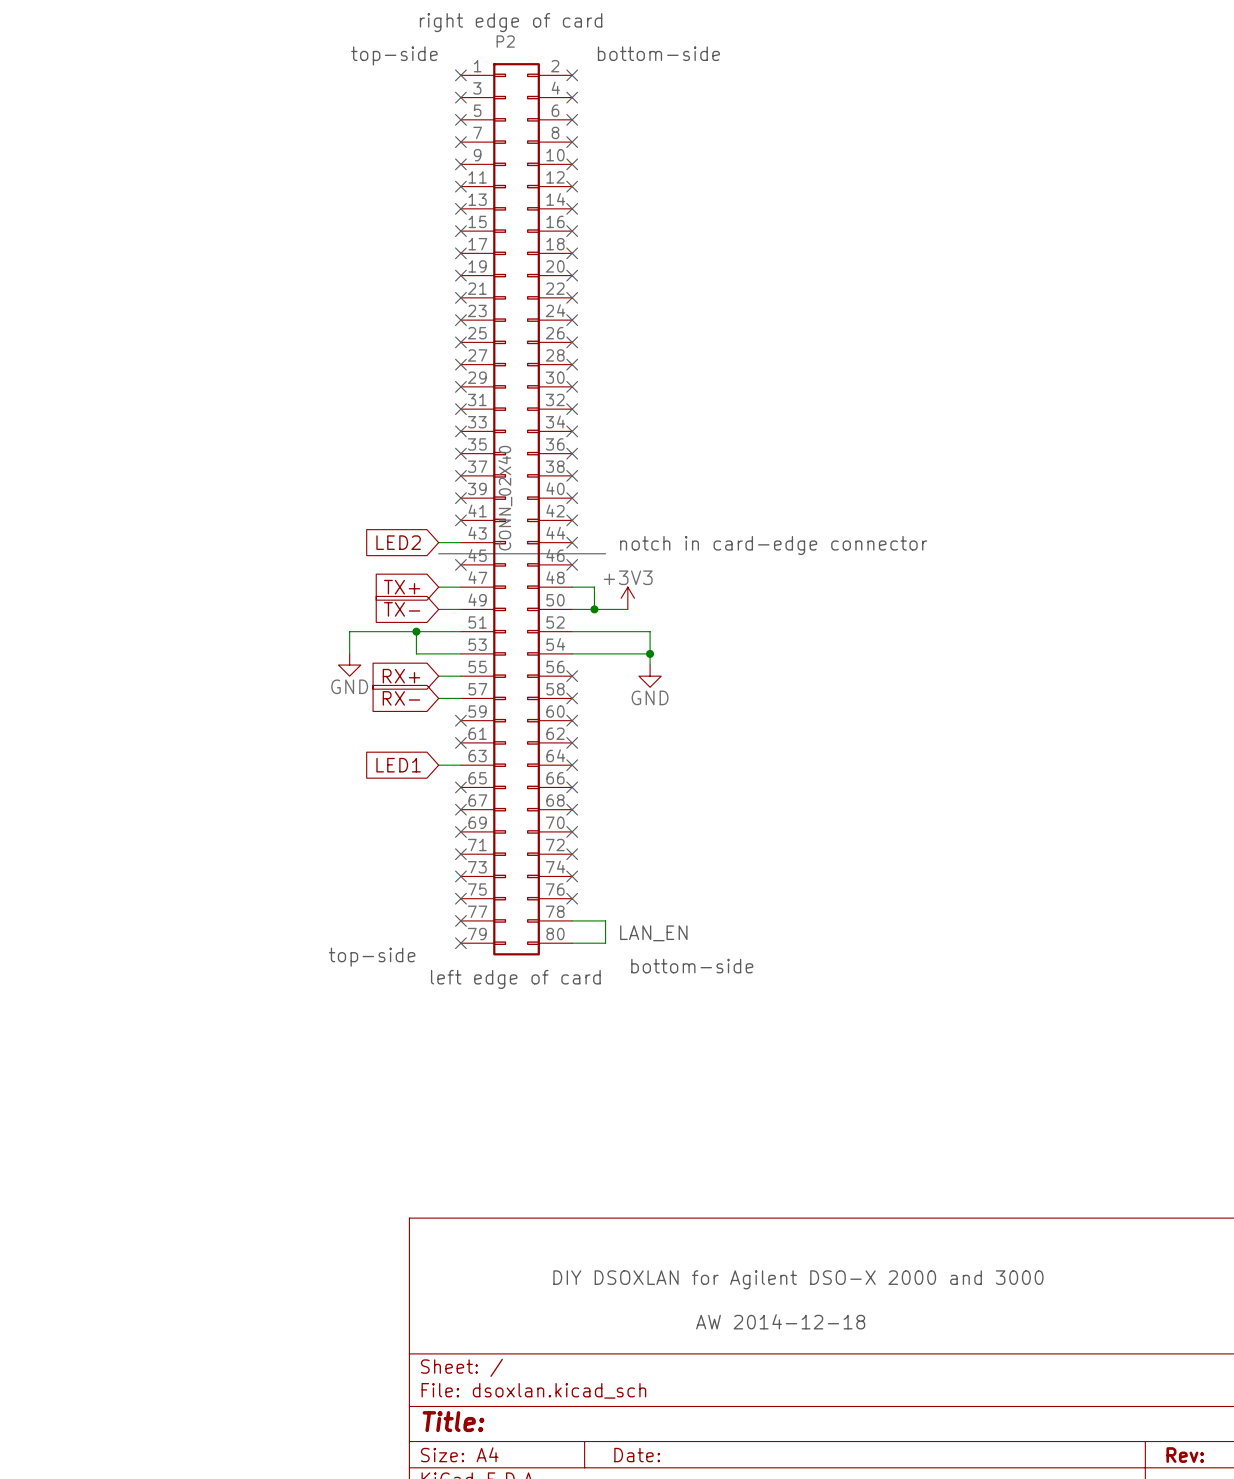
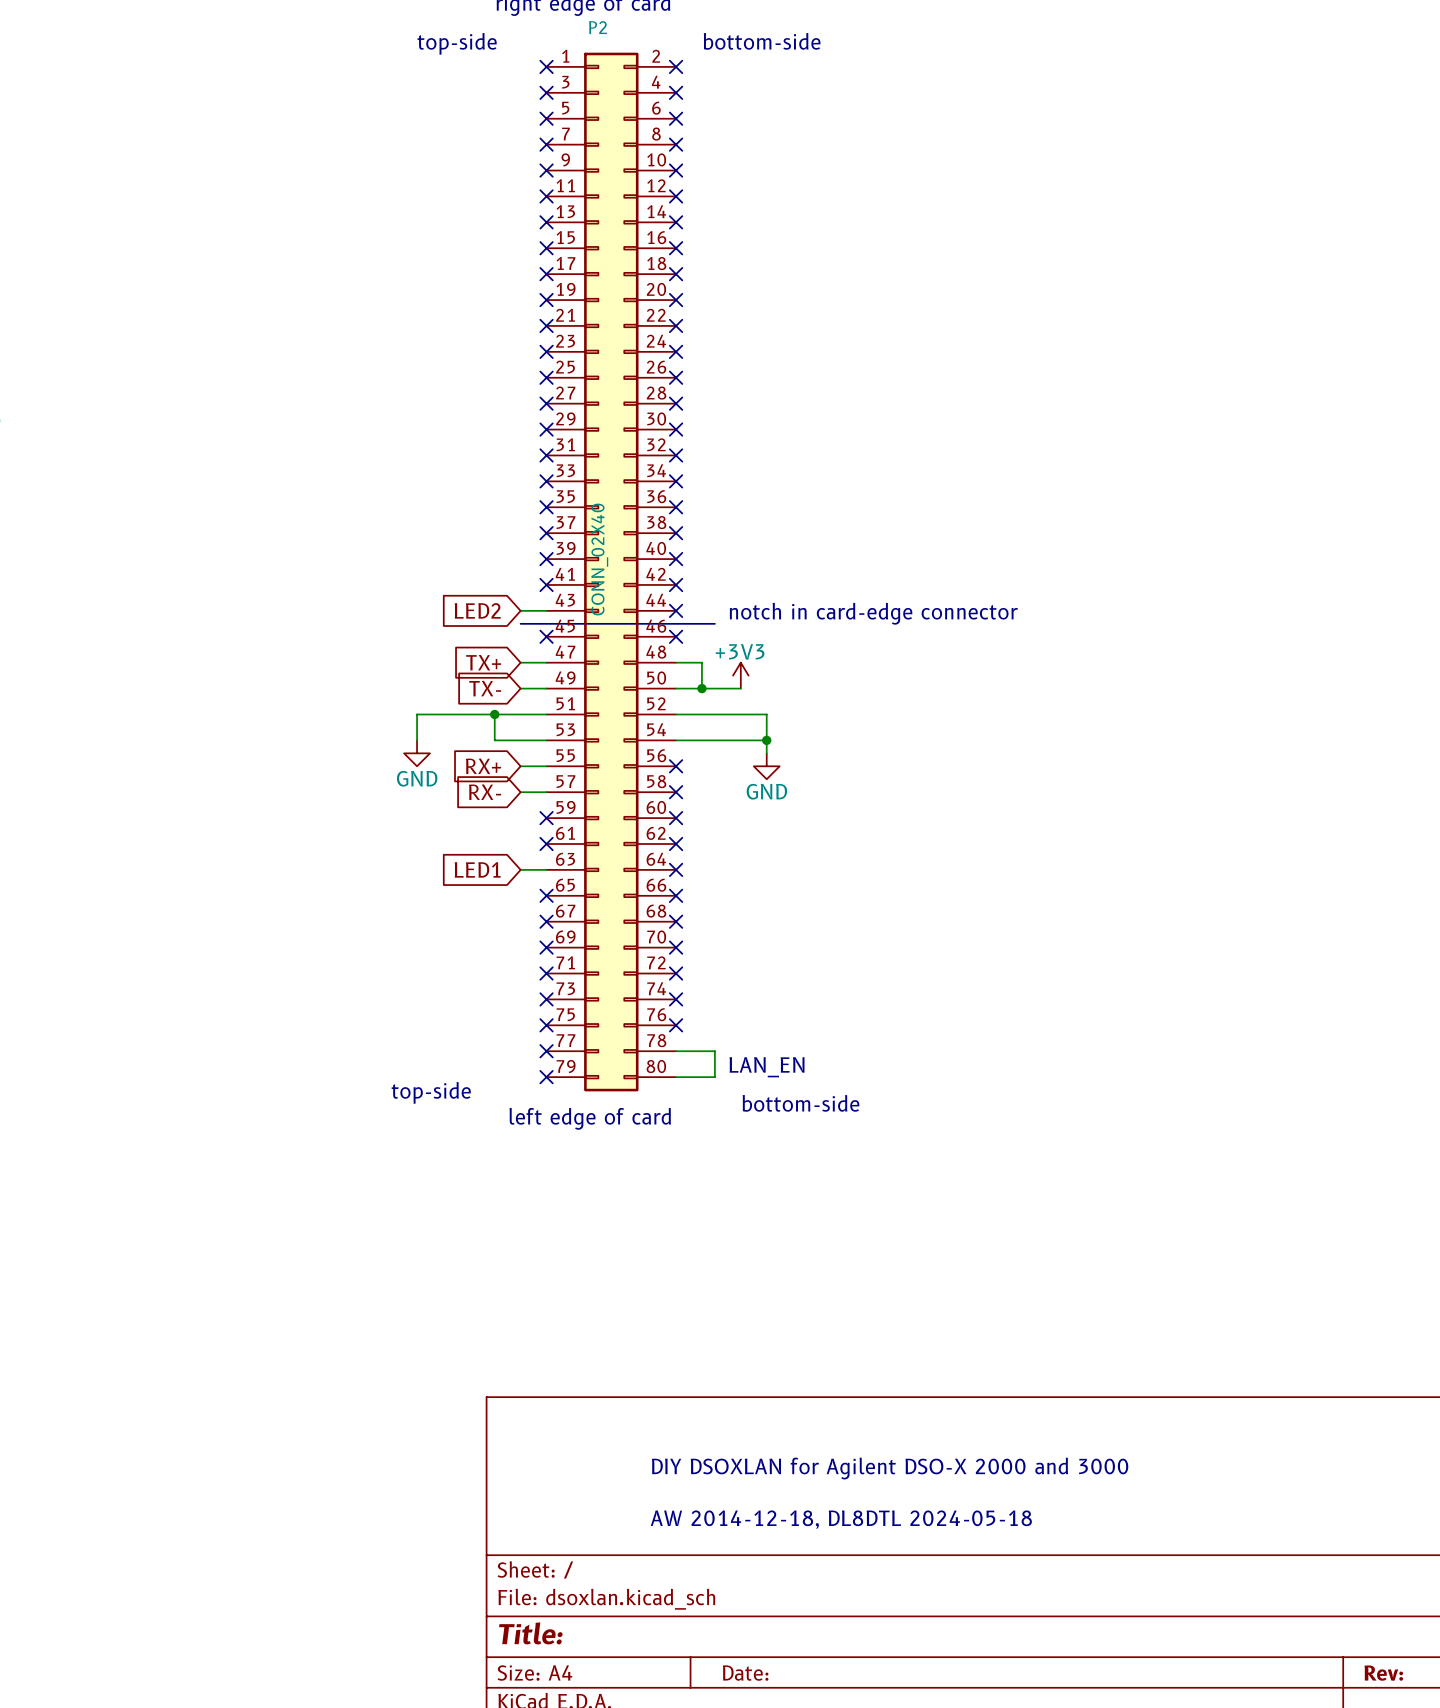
text: AW 2014-12-18 (780, 1321) -> none
text: none -> AW 2014-12-18, DL8DTL 2024-05-18 (841, 1519)

